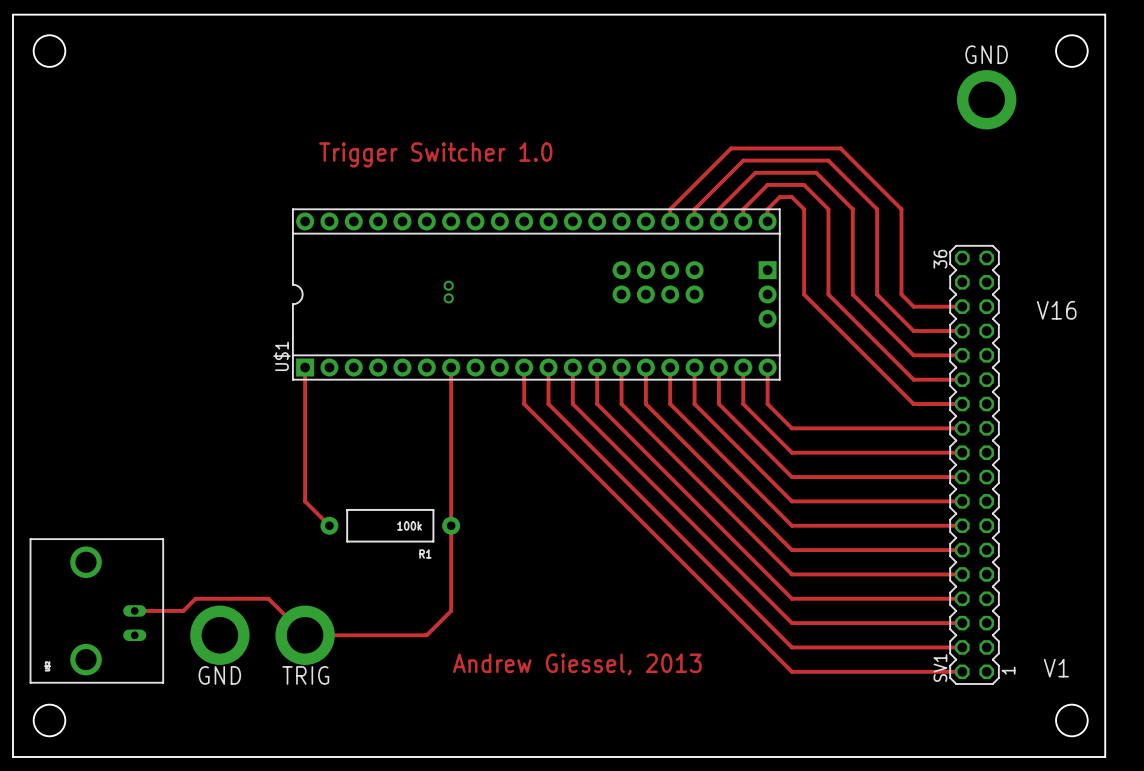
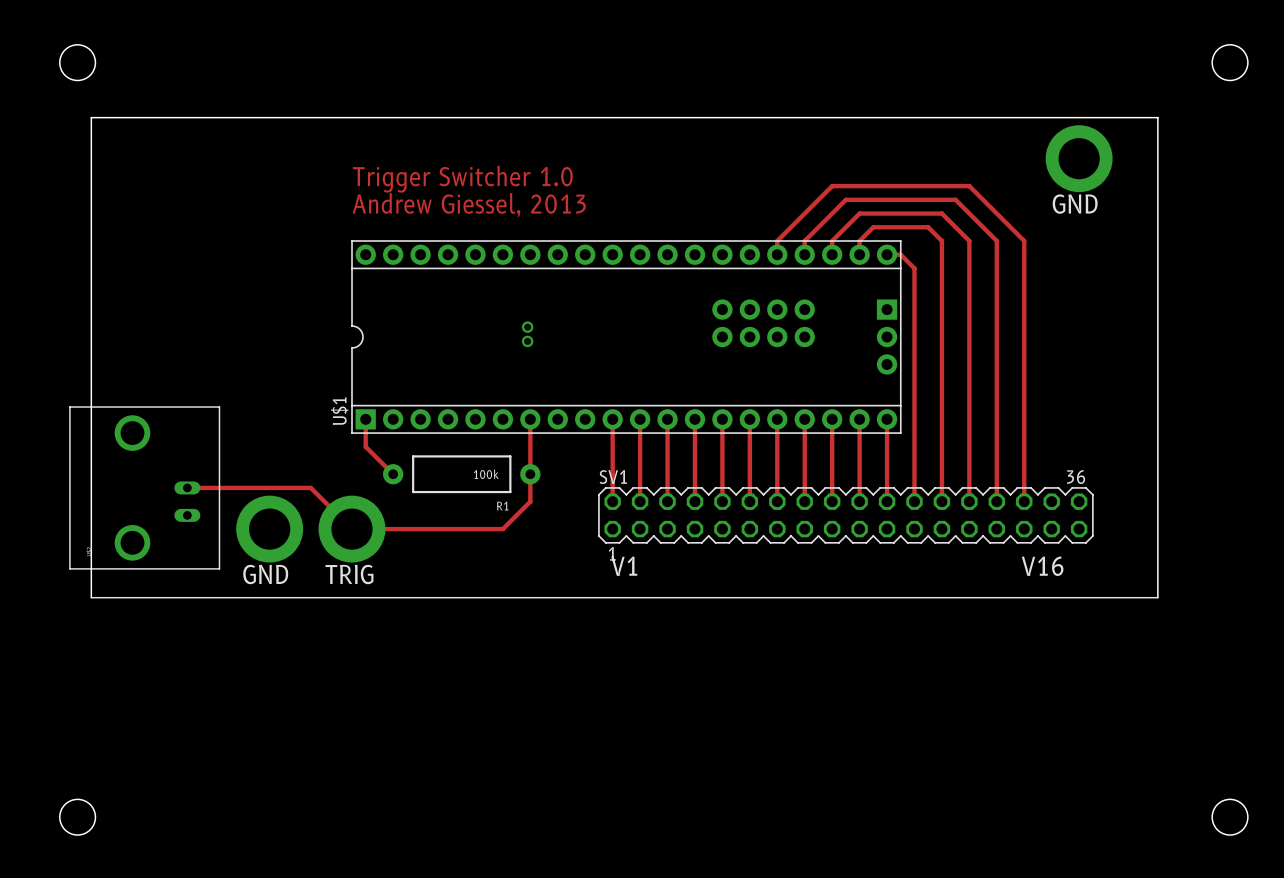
board edge: (12, 14) (1105, 14) (1105, 756) (12, 756) (12, 14) -> none
text position: GND (986, 54) -> GND (1075, 204)
part position: (986, 99) -> (1079, 158)
text position: Trigger Switcher 1.0 (435, 154) -> Trigger Switcher 1.0 (462, 179)
track: (718, 160) (731, 148) (840, 148) (901, 209) (901, 294) (913, 306) (962, 306) -> (832, 186) (859, 186)
track: (743, 160) (731, 172) -> (873, 199) (845, 199)
track: (828, 160) (877, 209) (877, 294) (913, 331) (962, 331) -> (955, 186) (969, 186) (1024, 241) (1024, 501)
track: (755, 172) (743, 184) -> (887, 213) (859, 213)
track: (816, 172) (852, 209) (852, 294) (913, 355) (962, 355) -> (941, 199) (955, 199) (996, 241) (996, 501)
text: none -> Andrew Giessel, 2013 (469, 205)
track: (767, 184) (755, 197) -> (900, 227) (873, 227)
track: (804, 184) (828, 209) (828, 294) (913, 379) (962, 379) -> (928, 213) (941, 213) (969, 241) (969, 501)
track: (779, 197) (767, 209) (767, 221) -> (914, 501) (914, 268) (900, 254) (887, 254)
track: (791, 197) (804, 209) (804, 294) (913, 404) (962, 404) -> (914, 227) (928, 227) (941, 241) (941, 501)
text position: V16 (1056, 310) -> V16 (1042, 566)
track: (305, 391) (305, 501) (329, 525) -> (365, 446) (393, 474)
track: (524, 404) (791, 671) (962, 671) -> (612, 460) (612, 501)
track: (548, 404) (791, 647) (962, 647) -> (640, 460) (640, 501)
track: (572, 404) (791, 623) (962, 623) -> (667, 460) (667, 501)
track: (597, 404) (791, 598) (962, 598) -> (694, 460) (694, 501)
track: (621, 404) (791, 574) (962, 574) -> (722, 460) (722, 501)
track: (645, 404) (791, 550) (962, 550) -> (749, 460) (749, 501)
track: (670, 404) (791, 525) (962, 525) -> (777, 460) (777, 501)
track: (694, 404) (791, 501) (962, 501) -> (804, 460) (804, 501)
track: (718, 404) (791, 477) (962, 477) -> (832, 460) (832, 501)
track: (743, 404) (791, 452) (962, 452) -> (859, 460) (859, 501)
track: (767, 404) (791, 428) (962, 428) -> (887, 460) (887, 501)
track: (451, 440) (451, 610) (427, 634) (305, 635) (268, 598) (195, 598) (183, 610) (134, 610) -> (530, 501) (502, 529) (352, 529) (310, 487) (187, 487)
part: none -> (269, 529)
part: none -> (352, 529)
SV1 rotation: 0° (974, 464) -> 90° clockwise (845, 515)
text: none -> V1 (624, 566)
board edge: none -> (91, 597) (91, 117) (1157, 117) (1157, 597)
line: none -> (91, 597) (1157, 597)
R1 position: (390, 525) -> (461, 474)
part position: (96, 610) -> (144, 487)
part: (219, 635) -> none
part: (305, 635) -> none
text: Andrew Giessel, 2013 (577, 664) -> none
text: V1 (1056, 668) -> none
text position: GND (219, 675) -> GND (265, 574)
text position: TRIG (305, 675) -> TRIG (349, 574)

